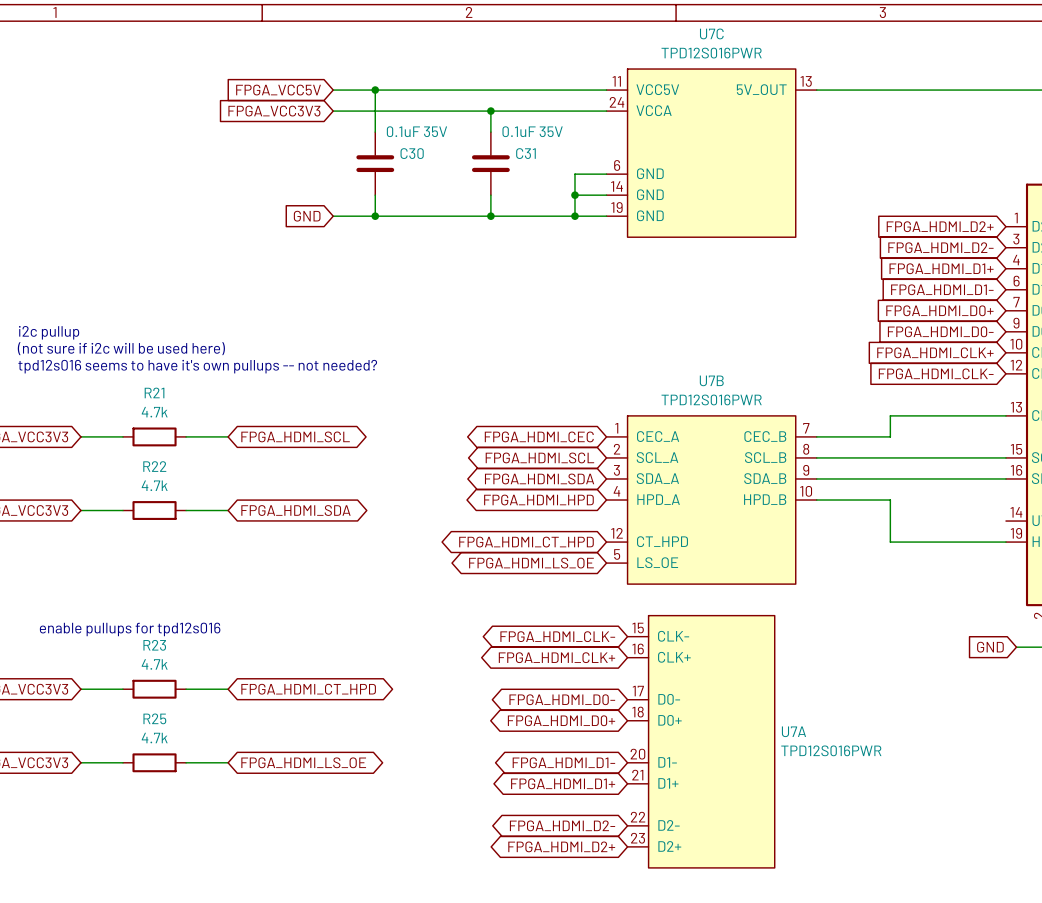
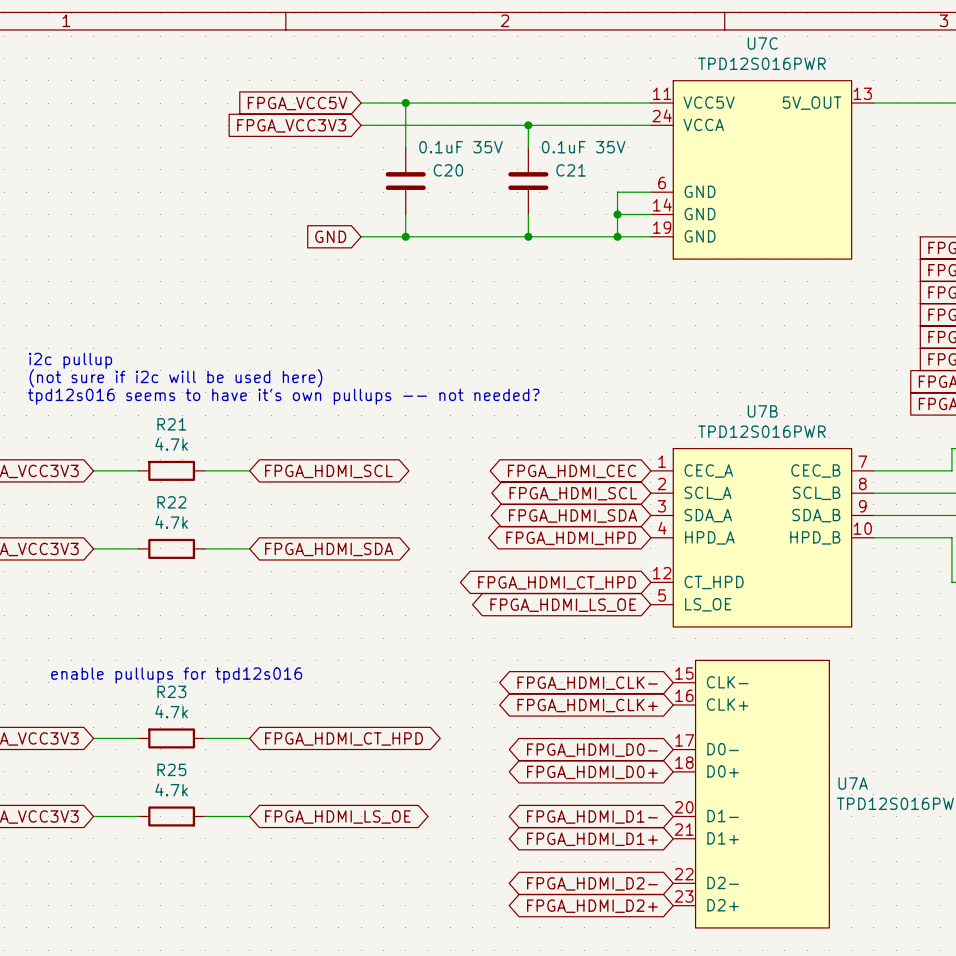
C30 name: C30 (412, 153) -> C20 (448, 170)
C31 name: C31 (525, 153) -> C21 (571, 170)

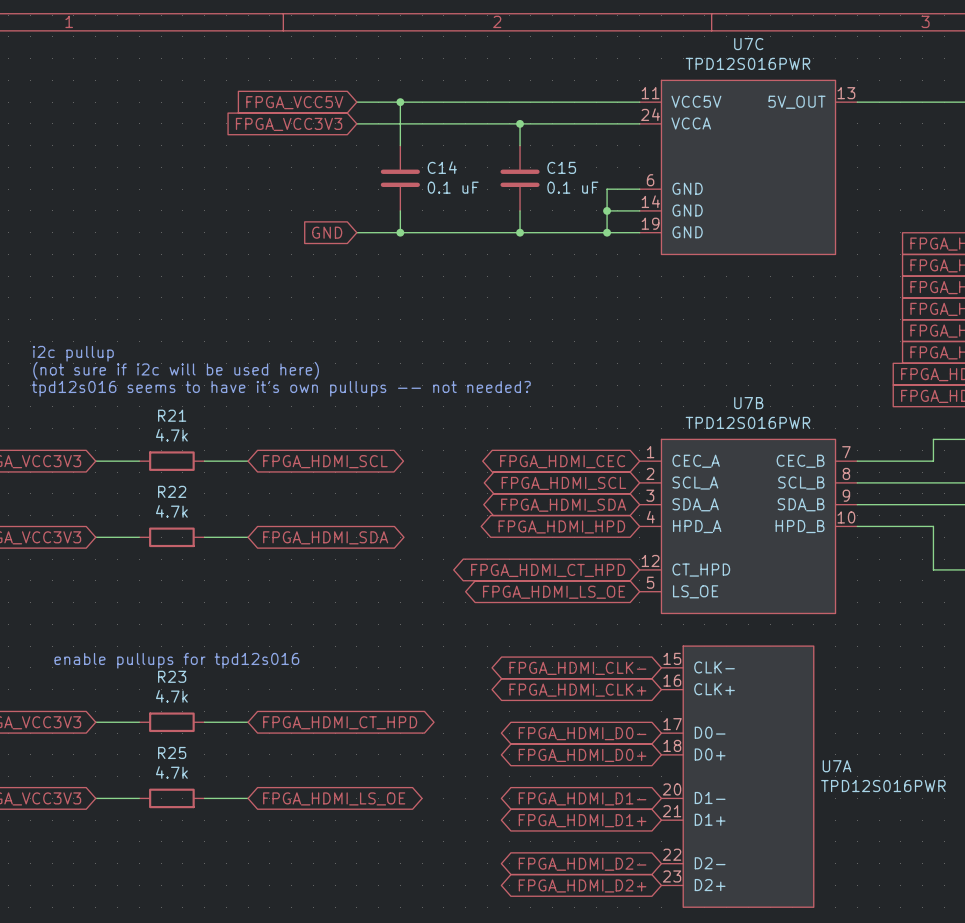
C20 value: 0.1uF 35V (461, 147) -> 0.1 uF (453, 187)
C21 value: 0.1uF 35V (583, 147) -> 0.1 uF (572, 187)
C20 name: C20 (448, 170) -> C14 (442, 167)
C21 name: C21 (571, 170) -> C15 (561, 167)

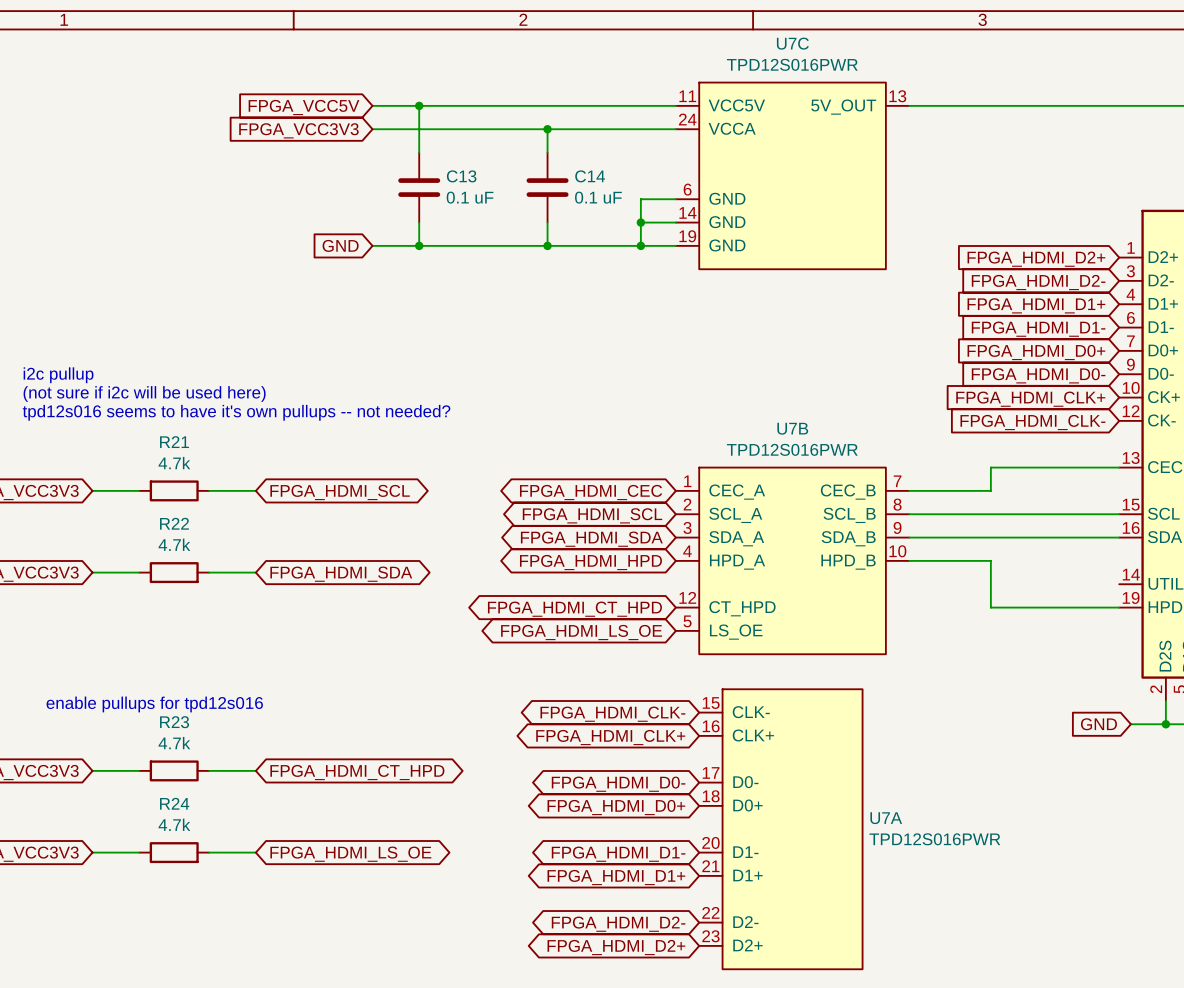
C14 name: C14 (442, 167) -> C13 (461, 176)
C15 name: C15 (561, 167) -> C14 (590, 176)
R25 name: R25 (172, 752) -> R24 (174, 803)

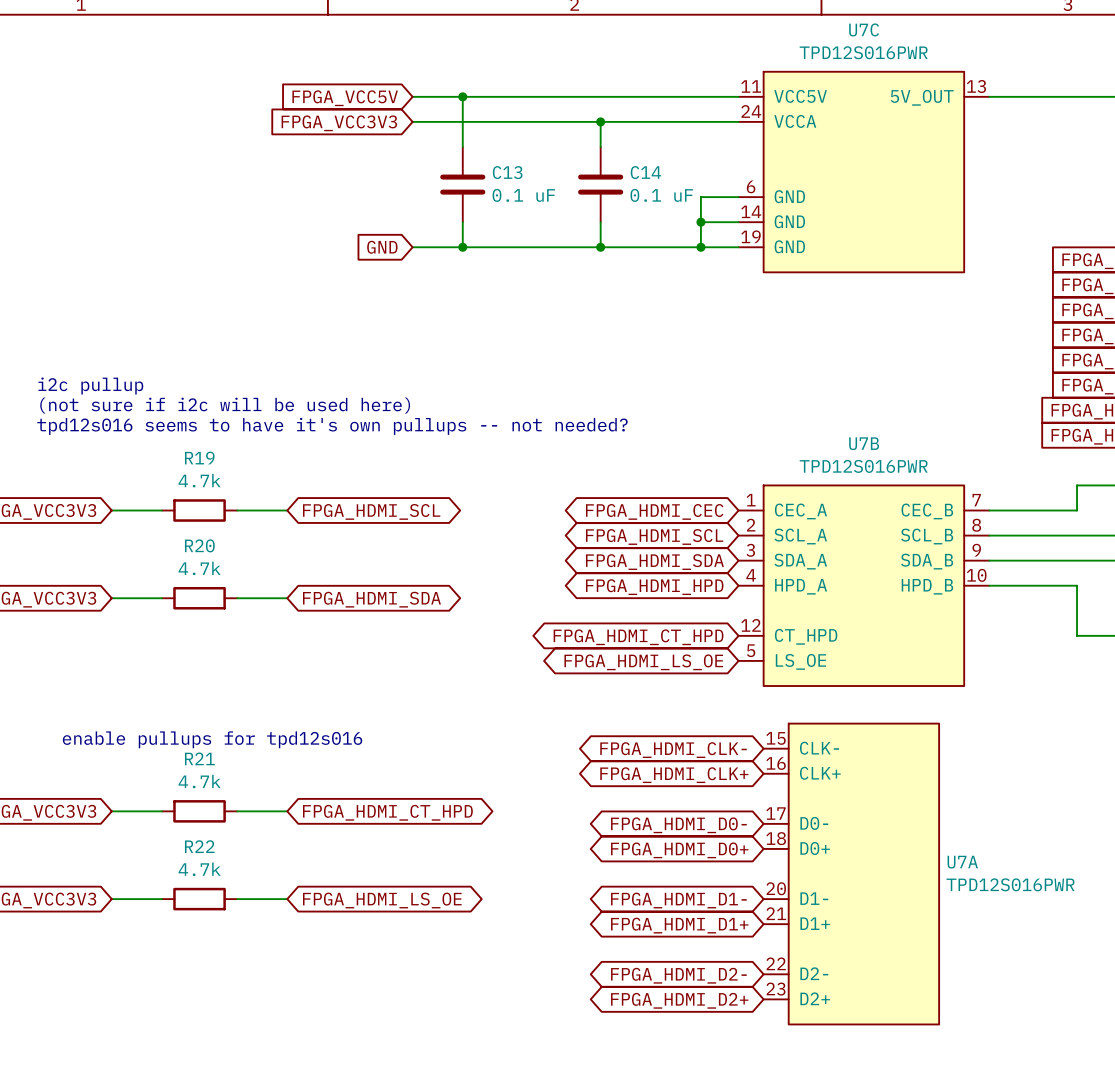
R21 name: R21 (174, 442) -> R19 (199, 458)
R22 name: R22 (174, 523) -> R20 (199, 545)
R23 name: R23 (174, 722) -> R21 (199, 758)
R24 name: R24 (174, 803) -> R22 (199, 846)

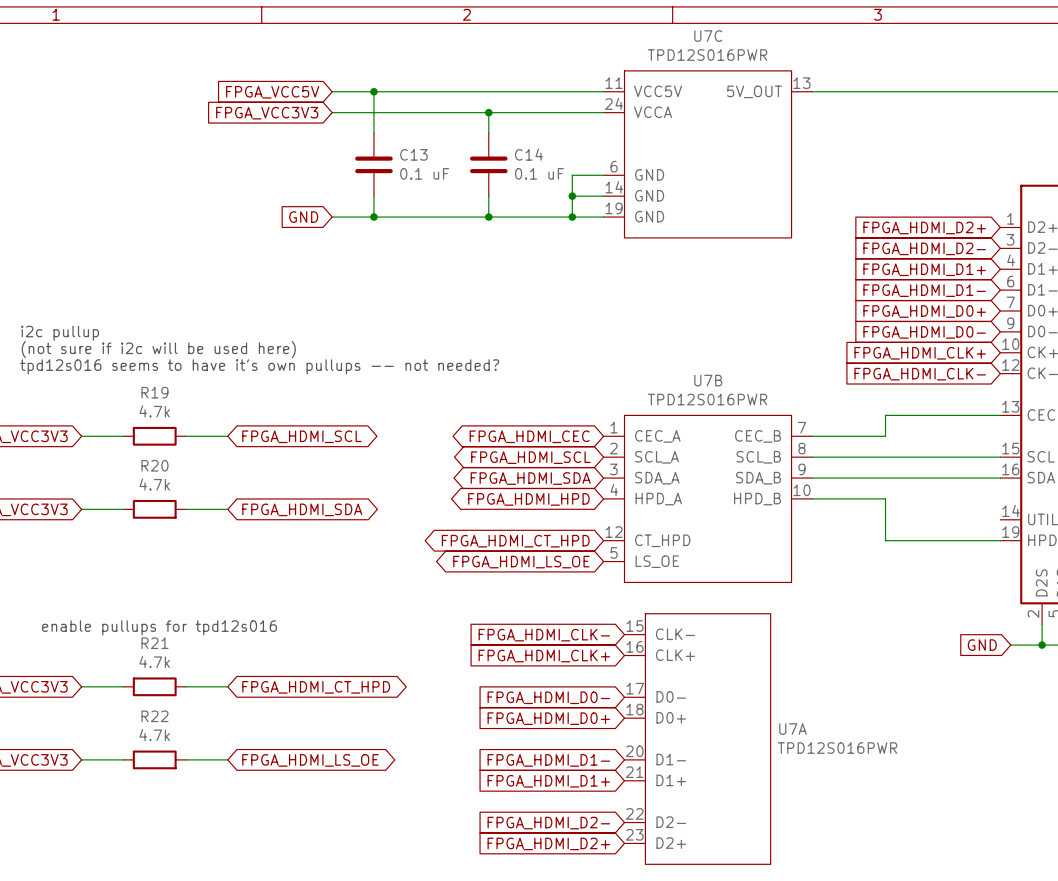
global label shape: bidirectional (673, 750) -> input (544, 635)
global label shape: bidirectional (674, 775) -> input (544, 656)
global label shape: bidirectional (678, 825) -> input (548, 697)
global label shape: bidirectional (679, 850) -> input (548, 718)
global label shape: bidirectional (678, 900) -> input (548, 760)
global label shape: bidirectional (679, 925) -> input (548, 781)
global label shape: bidirectional (678, 975) -> input (548, 823)
global label shape: bidirectional (679, 1000) -> input (548, 843)

